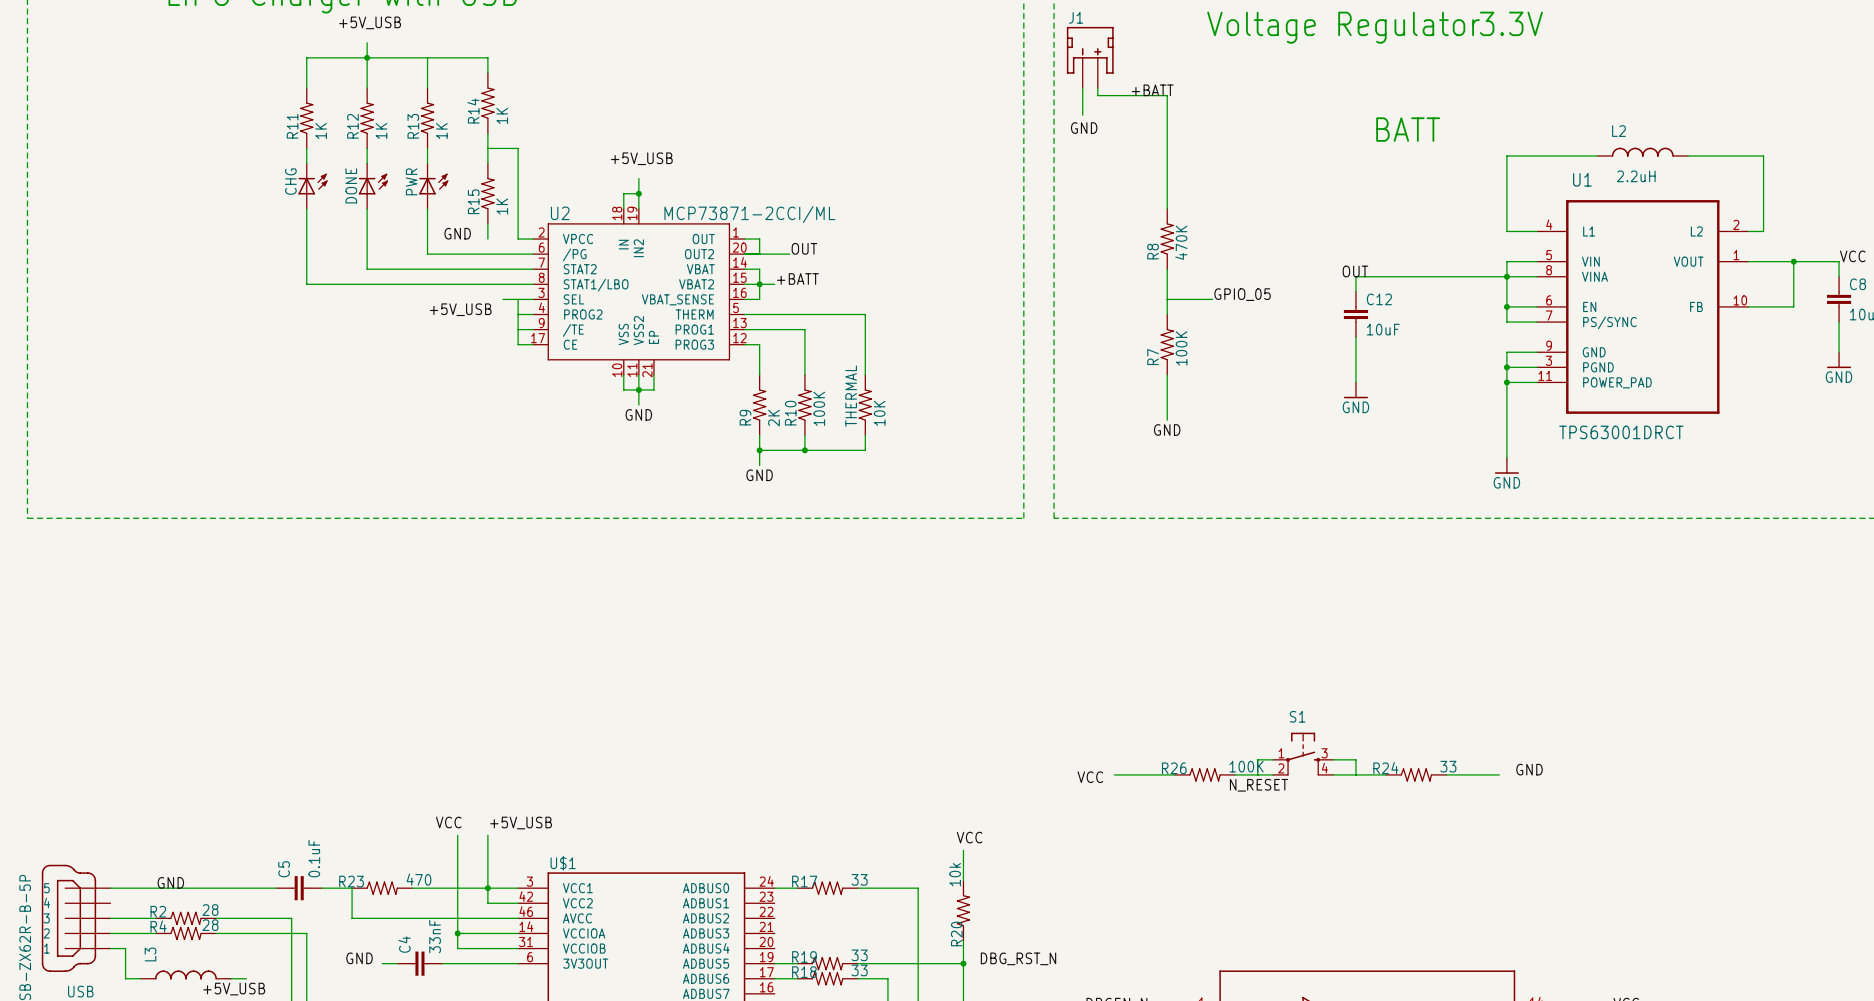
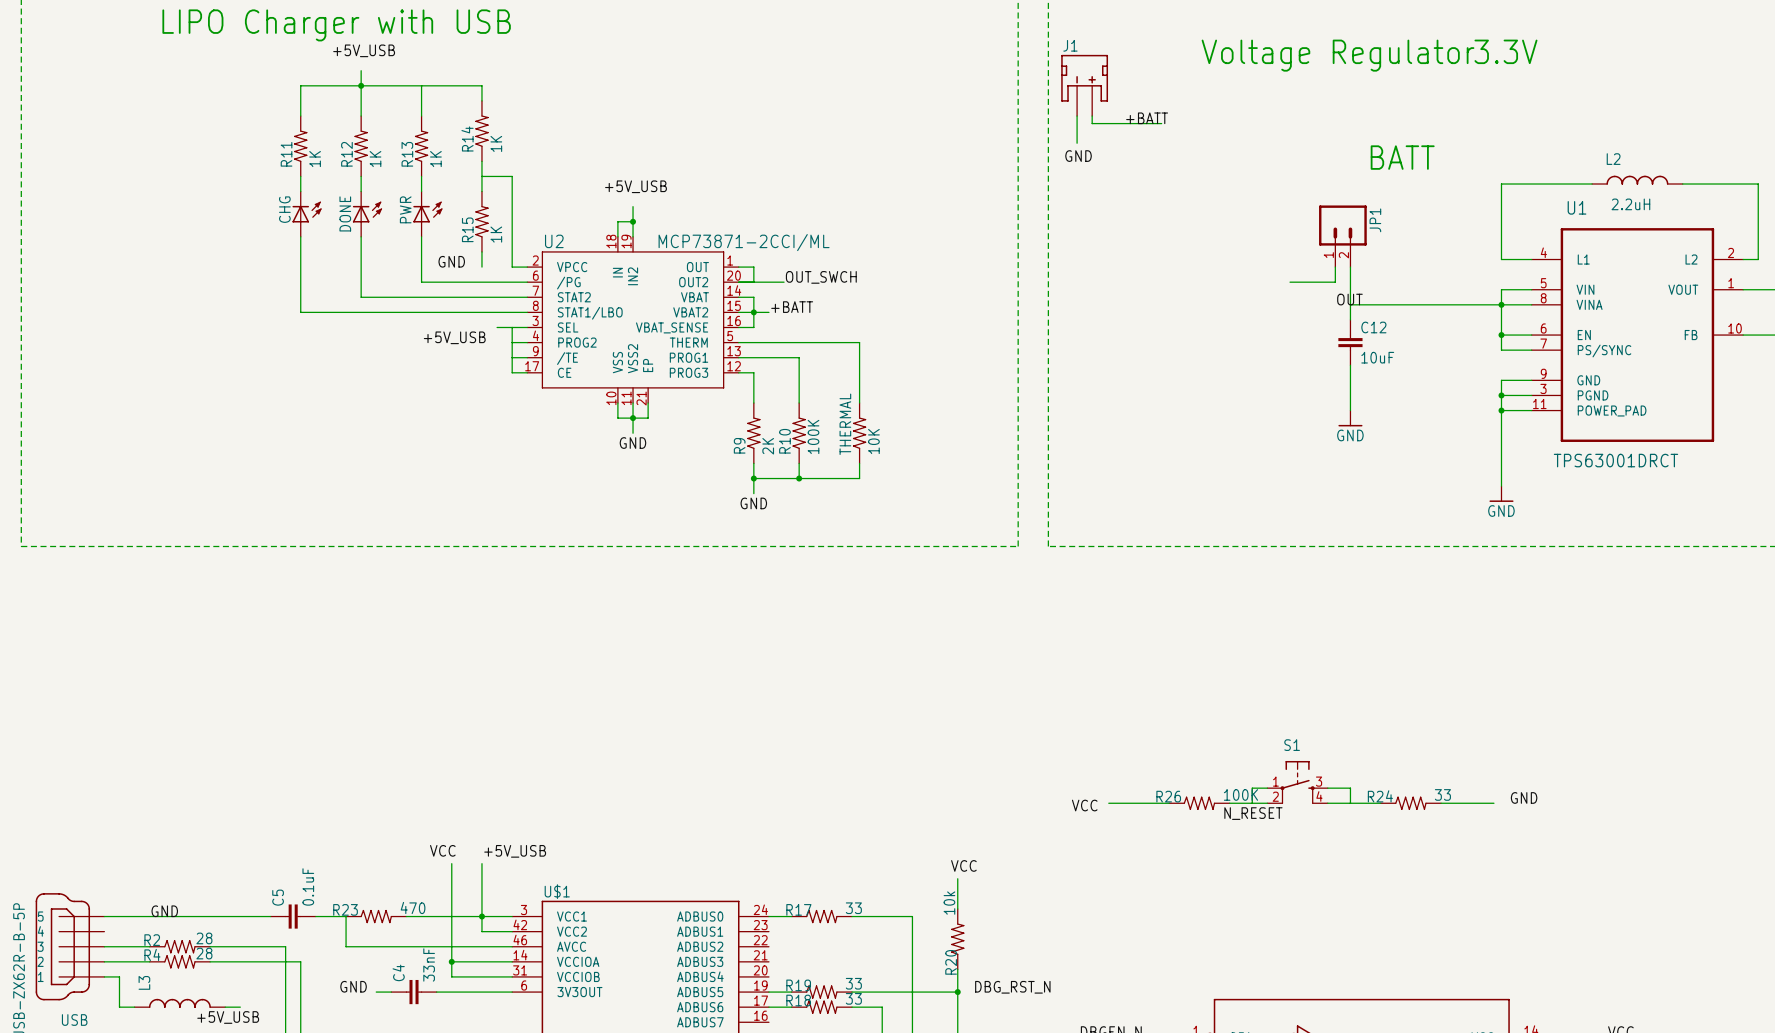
wire: (1167, 95) (1167, 208) -> none
JP1: none -> (1342, 236)
R8: 470K (1167, 239) -> none
wire: none -> (1335, 267) (1335, 282) (1290, 282)
wire: none -> (1350, 267) (1350, 304)
label: OUT (804, 248) -> OUT_SWCH (821, 277)
wire: (1167, 269) (1167, 314) -> none
label: GPIO_05 (1242, 294) -> none
wire: (1167, 299) (1212, 299) -> none
R7: 100K (1167, 344) -> none
wire: (1167, 374) (1167, 420) -> none
label: GND (1167, 429) -> none

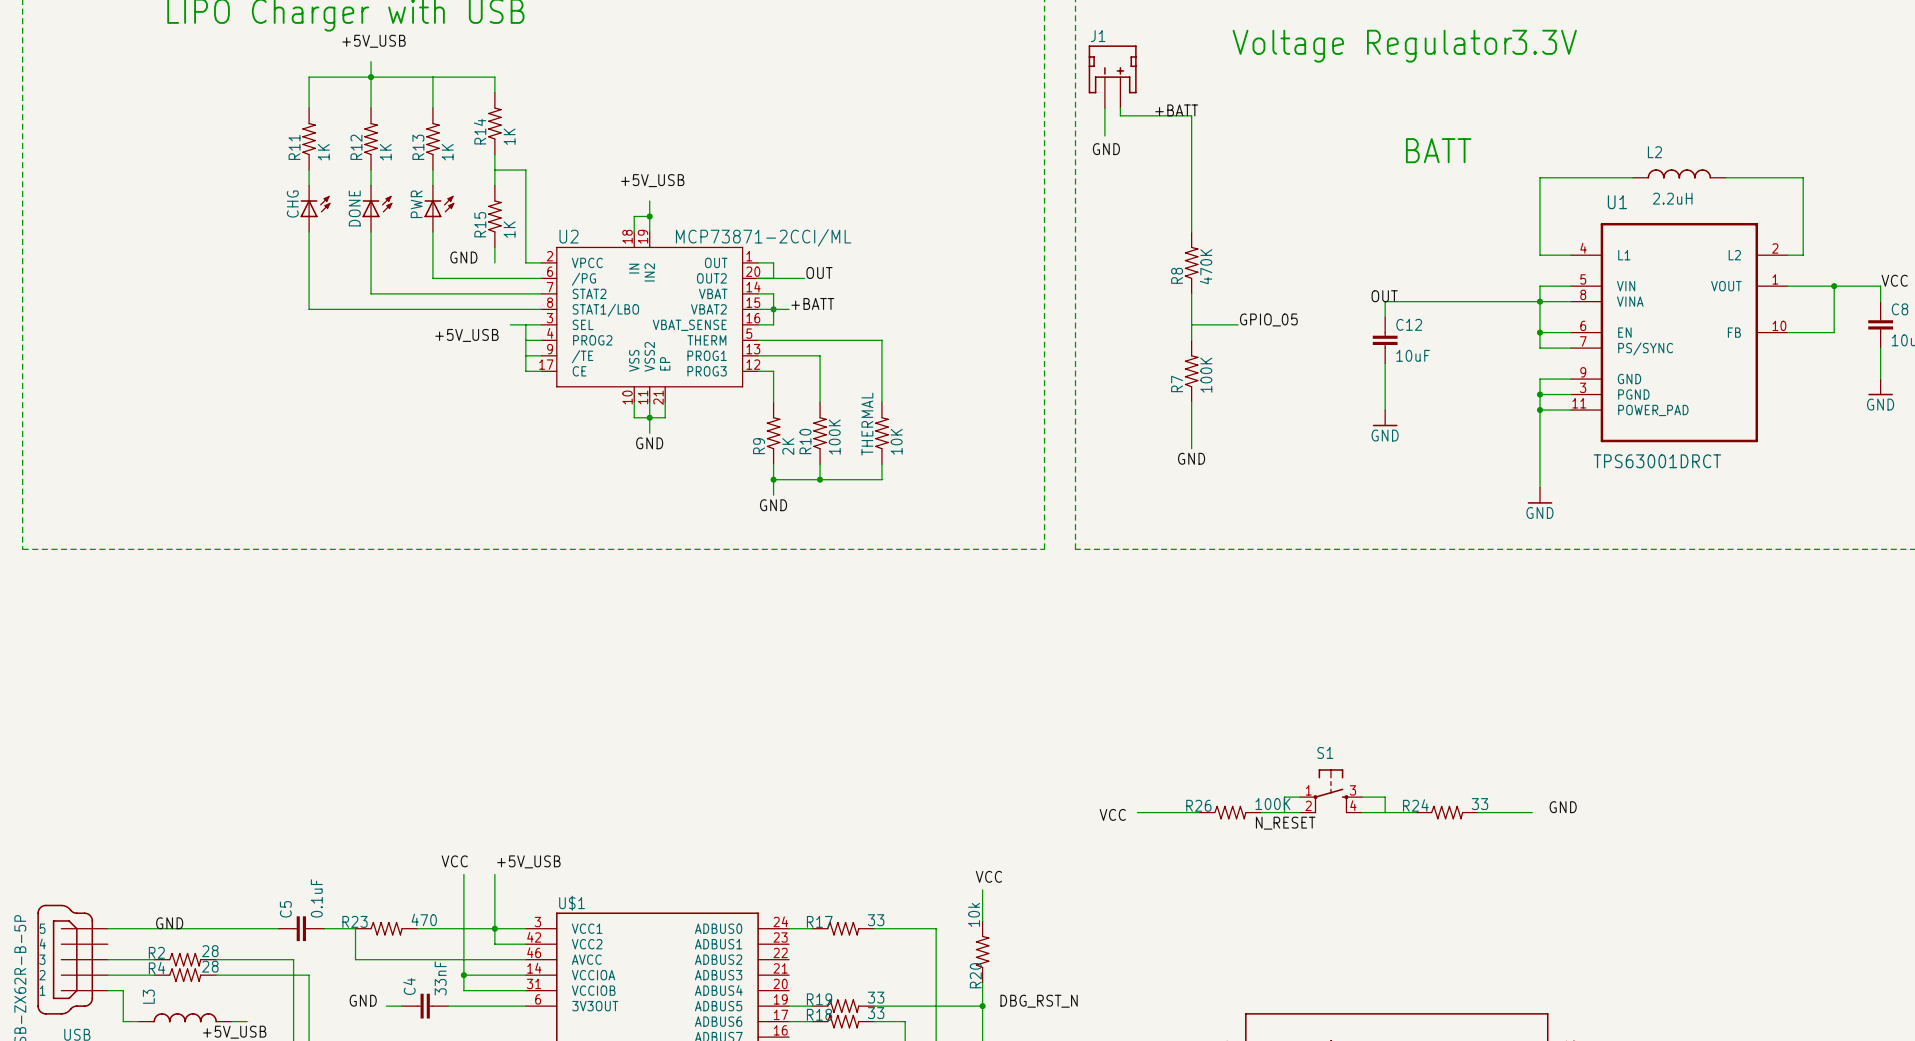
wire: none -> (1191, 115) (1191, 231)
JP1: (1342, 236) -> none
R8: none -> 470K (1191, 262)
wire: (1335, 267) (1335, 282) (1290, 282) -> none
wire: (1350, 267) (1350, 304) -> none
label: OUT_SWCH (821, 277) -> OUT (819, 272)
wire: none -> (1191, 293) (1191, 340)
label: none -> GPIO_05 (1268, 319)
wire: none -> (1191, 324) (1238, 324)
R7: none -> 100K (1191, 371)
wire: none -> (1191, 402) (1191, 448)
label: none -> GND (1191, 458)

